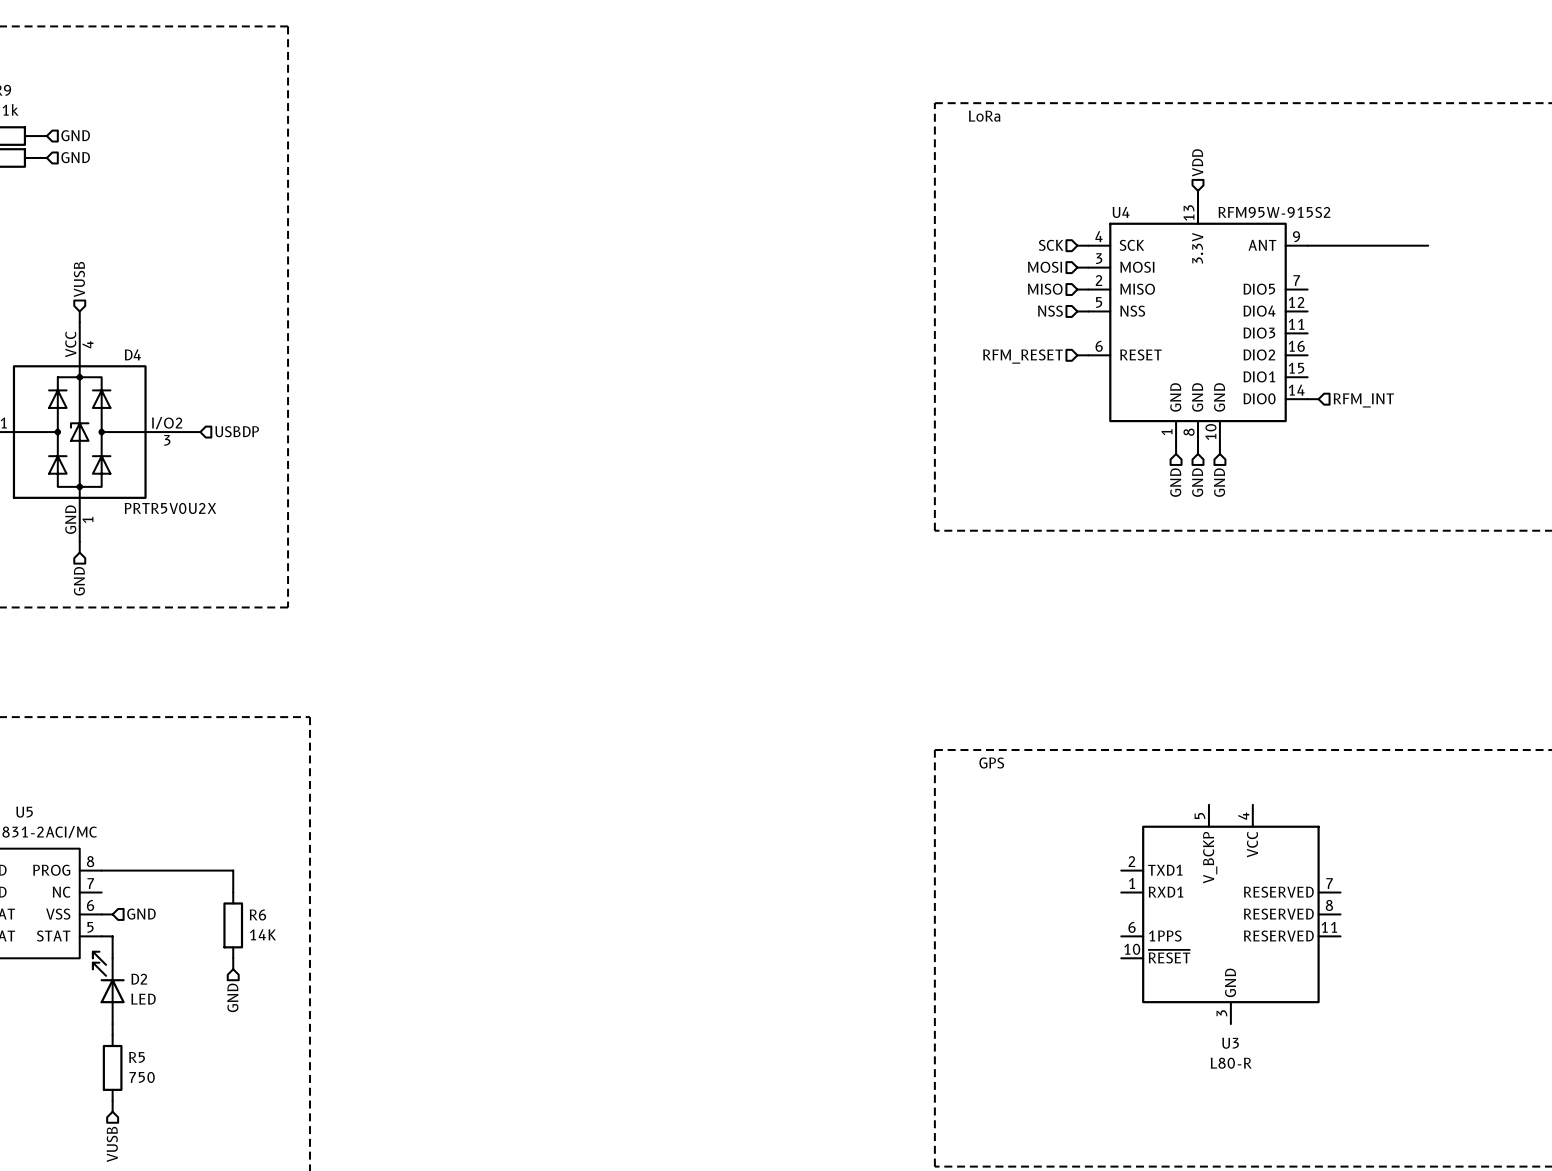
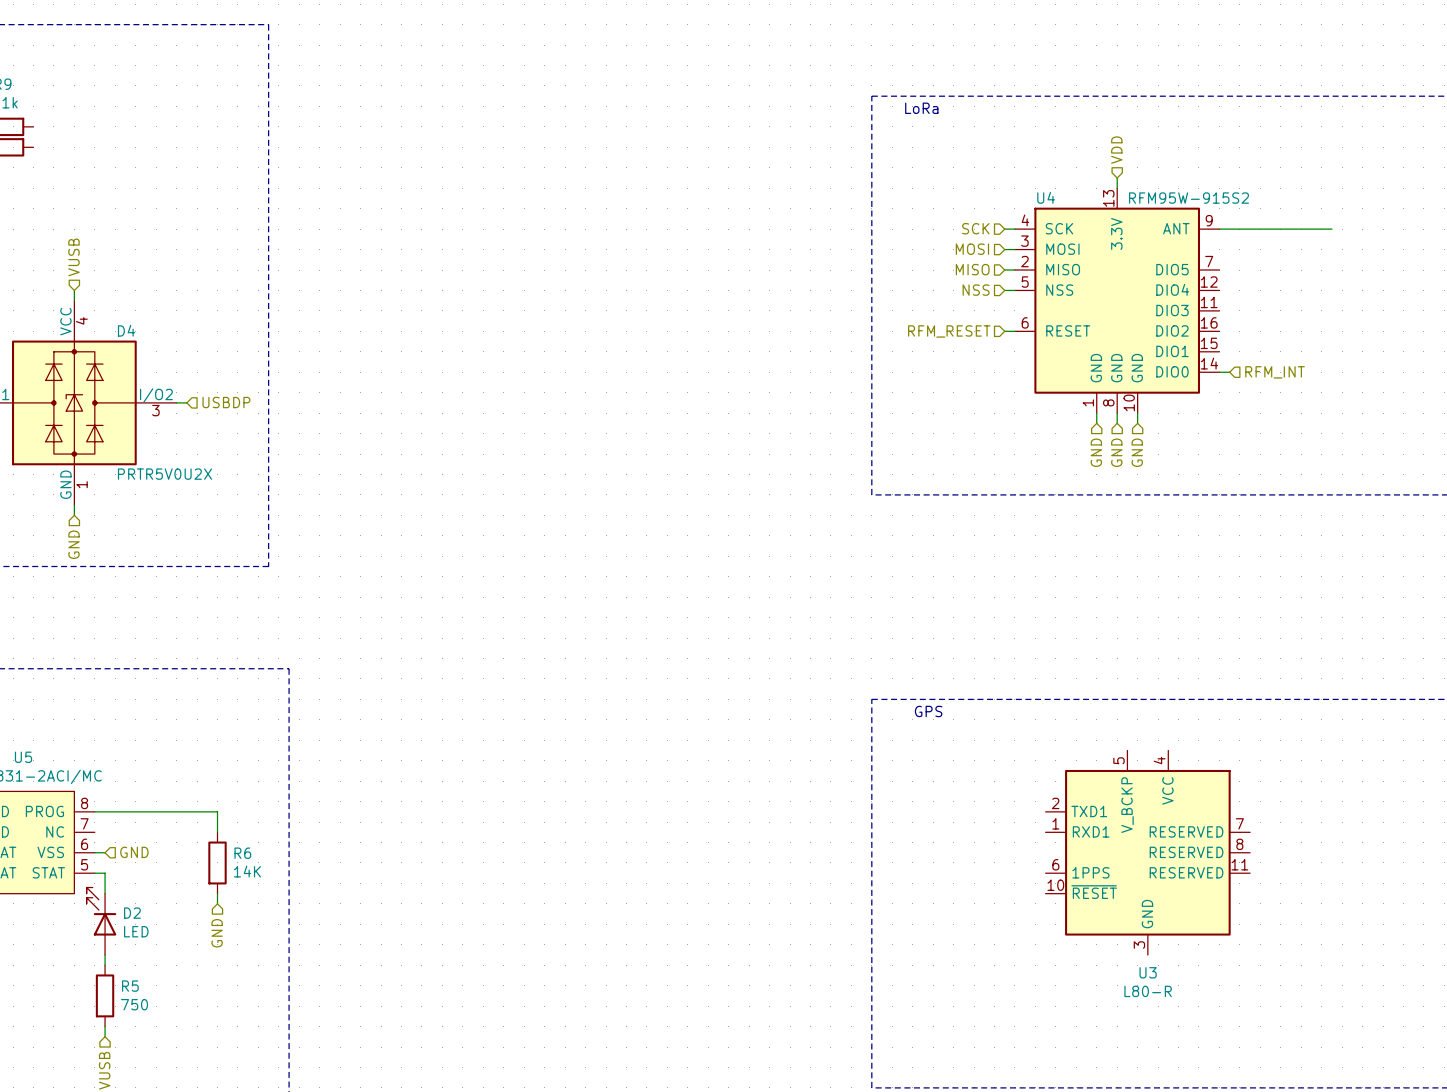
hierarchical label: GND (75, 135) -> none
wire: (35, 136) (46, 136) -> none
wire: (35, 157) (46, 157) -> none
hierarchical label: GND (75, 157) -> none

